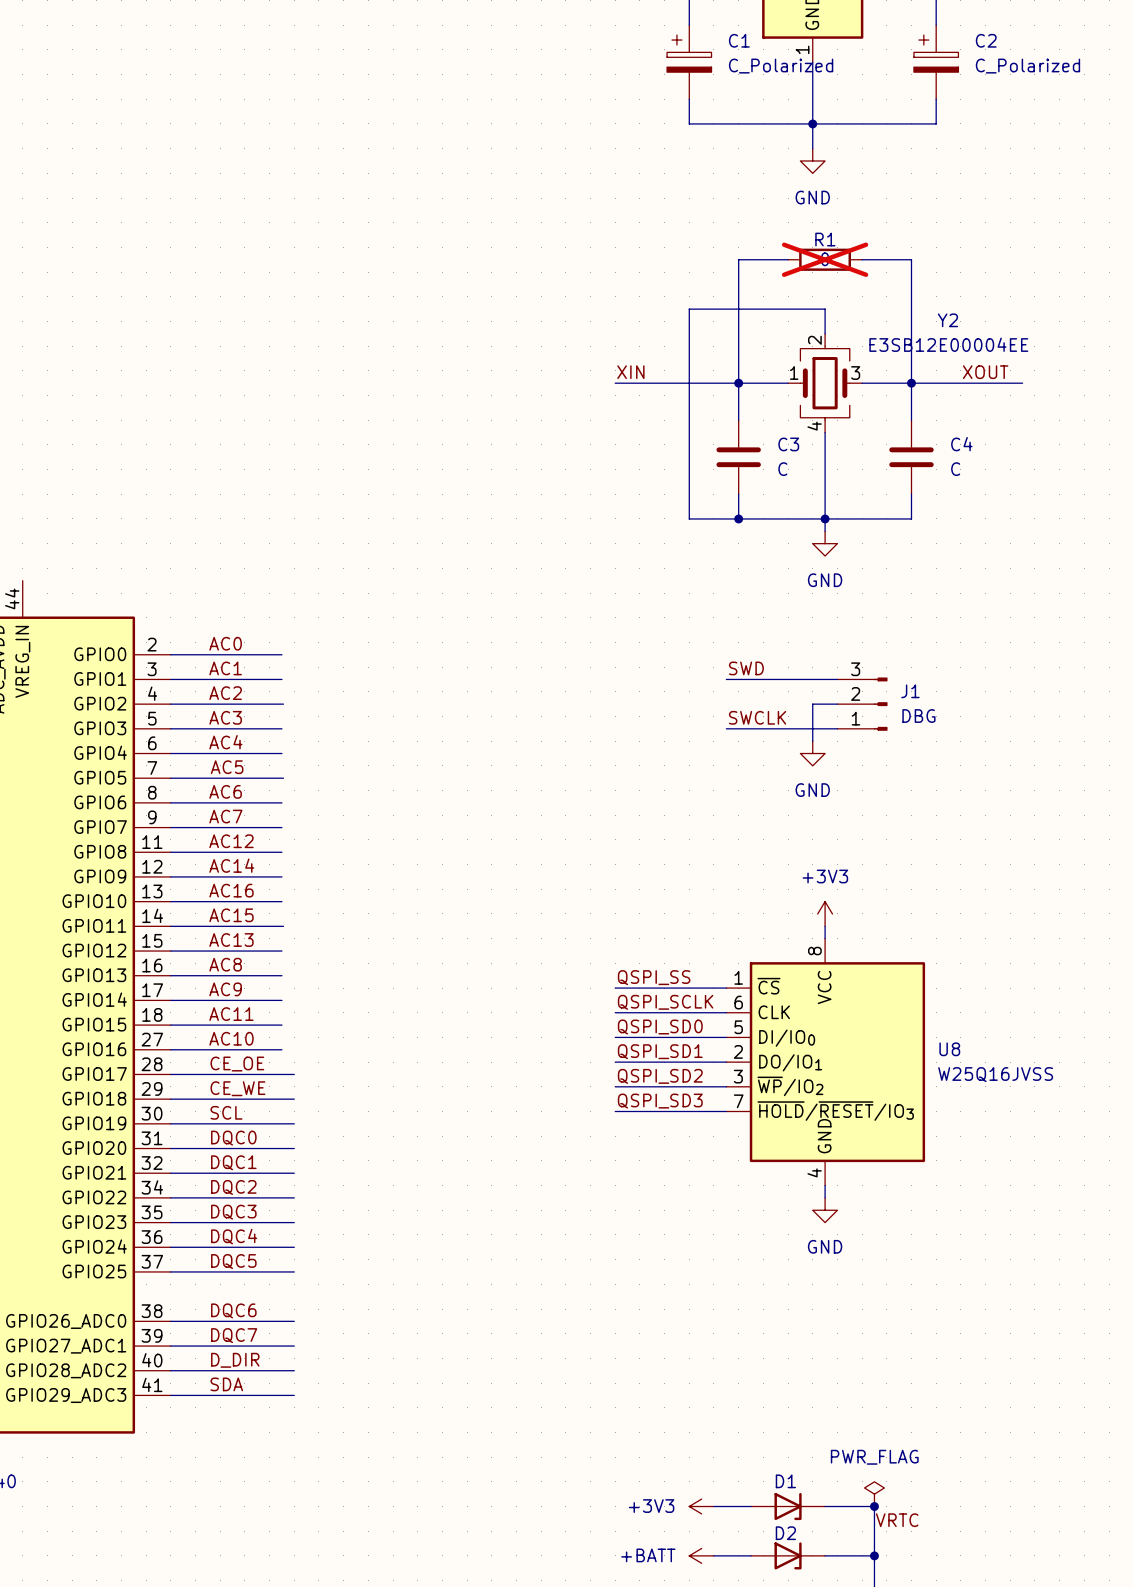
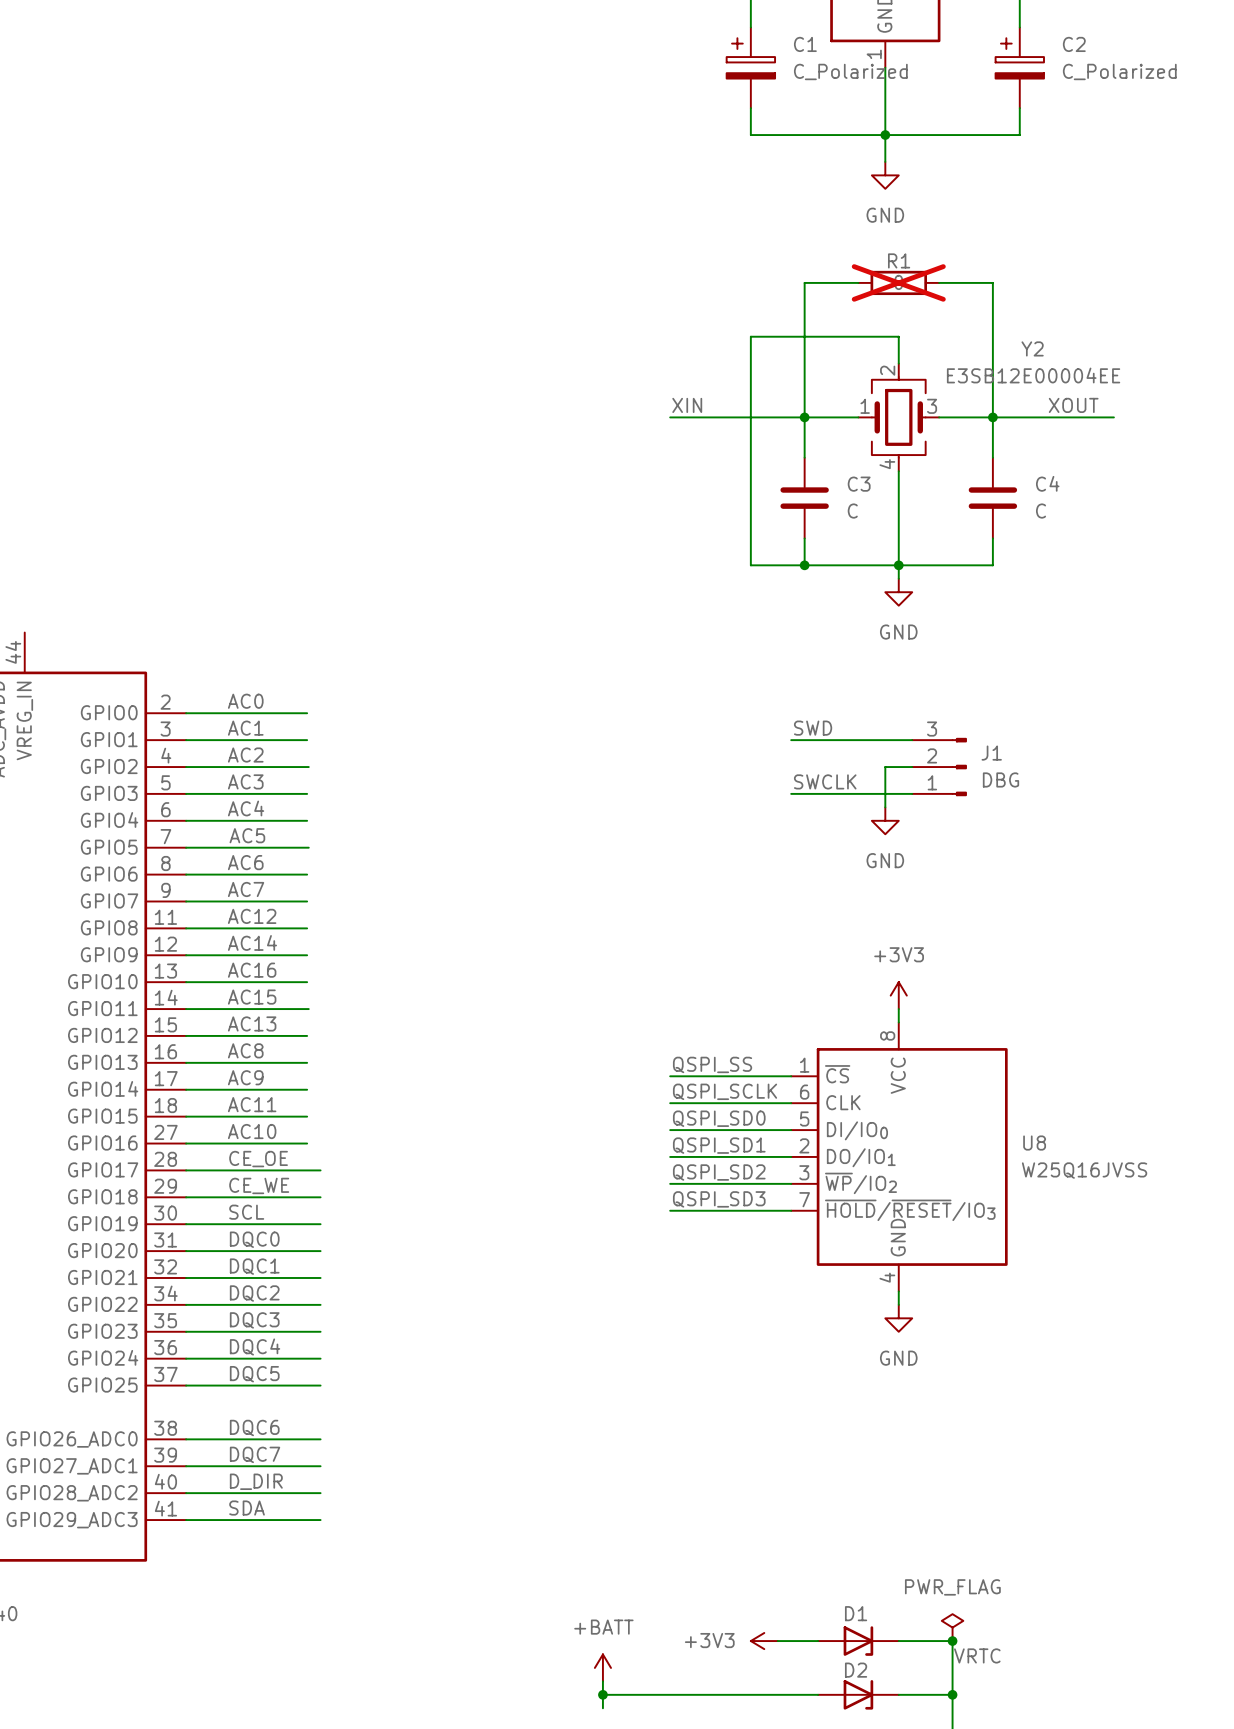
wire: none -> (602, 1681) (602, 1708)
wire: none -> (602, 1694) (777, 1694)
junction: none -> (602, 1694)
power symbol text position: +BATT (648, 1555) -> +BATT (603, 1627)
power symbol rotation: 0° (701, 1555) -> 90° clockwise (602, 1667)
power symbol position: +BATT (701, 1555) -> +BATT (602, 1667)

